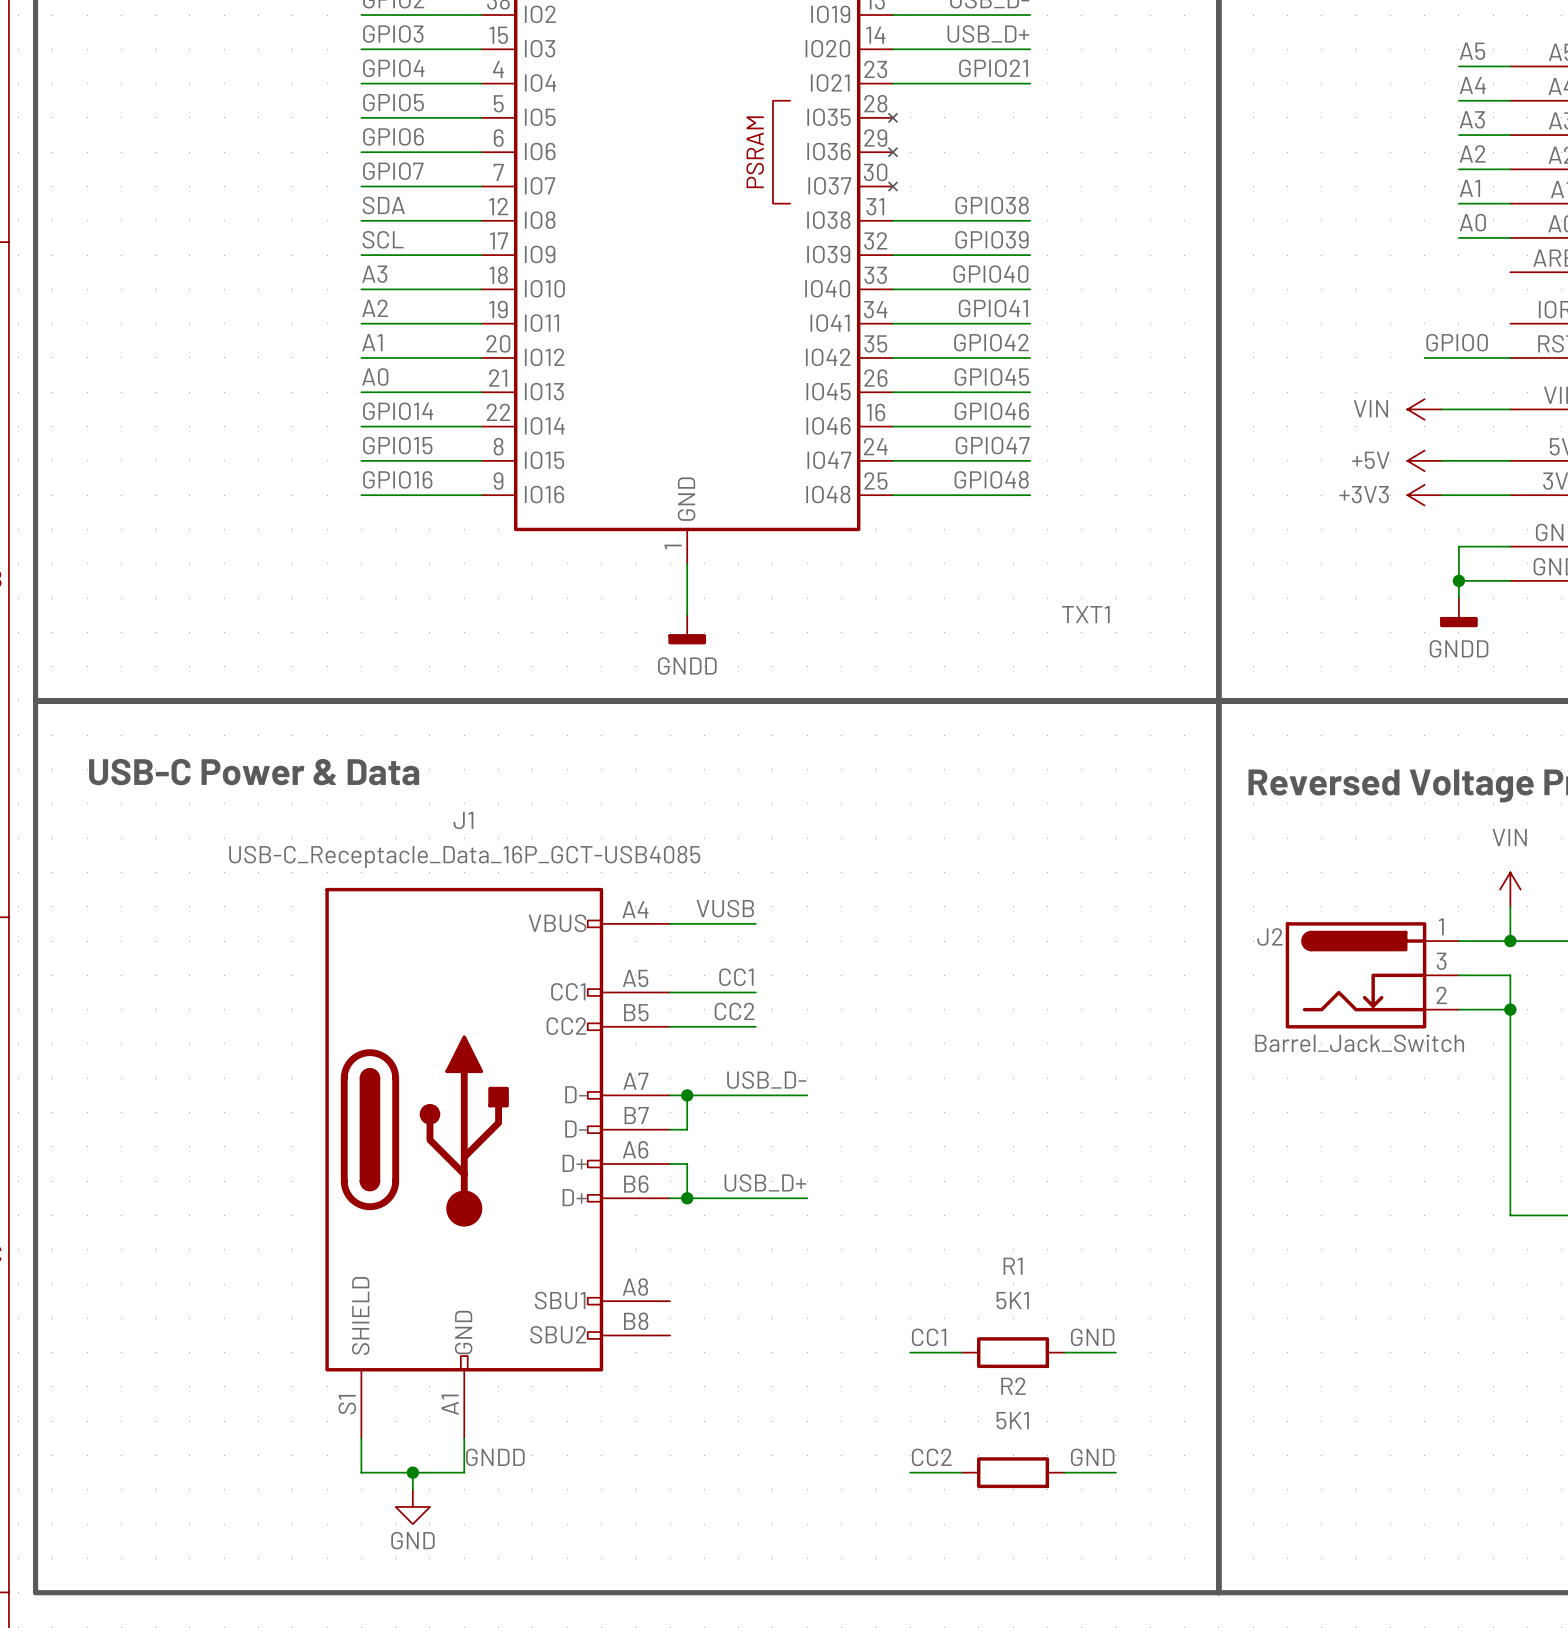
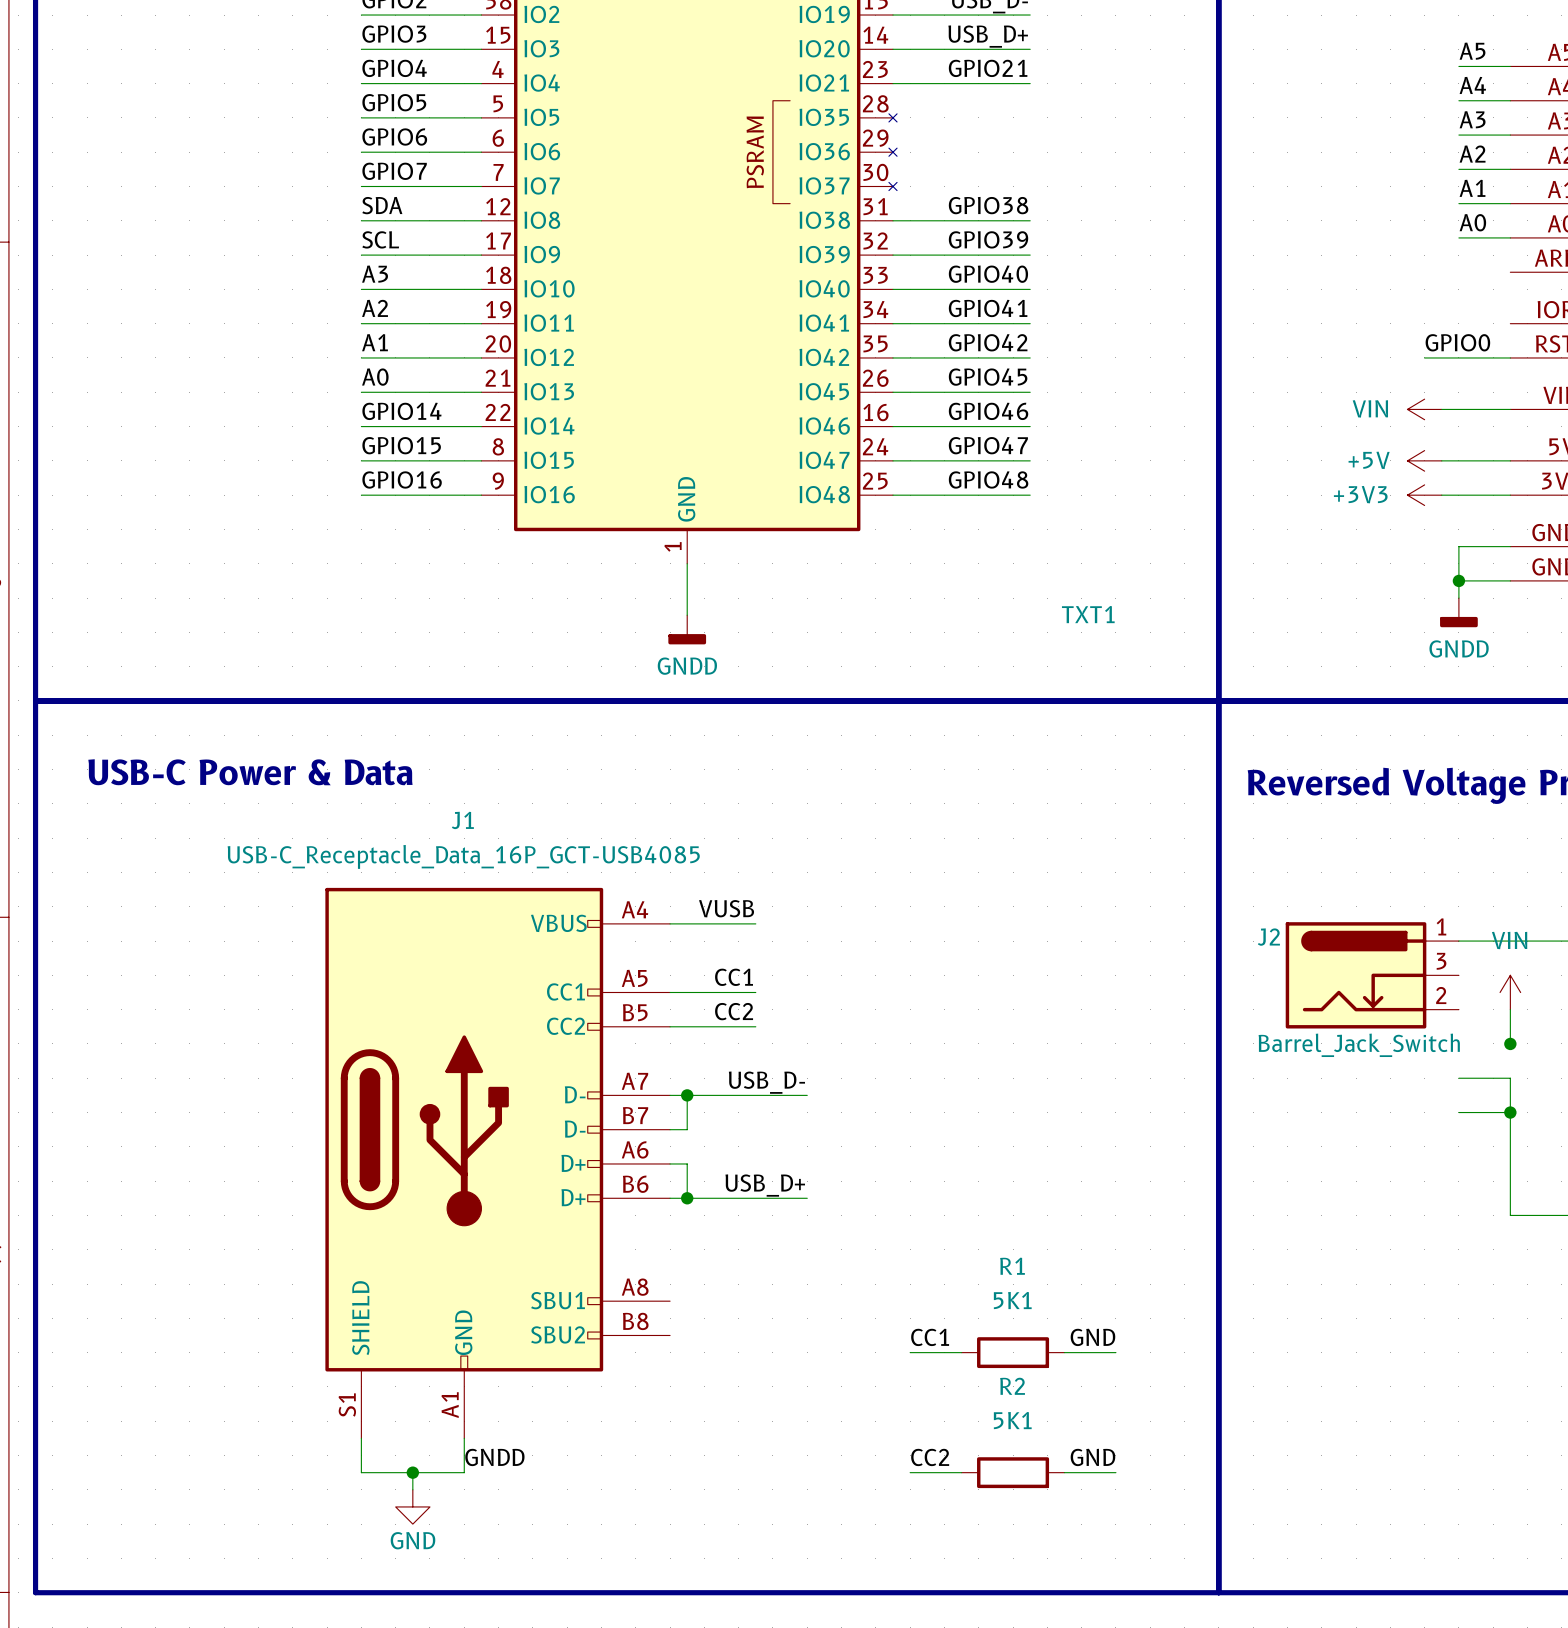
power symbol position: VIN (1510, 889) -> VIN (1510, 992)
wire: (1510, 906) (1510, 941) -> none
junction: (1510, 941) -> none
wire: (1458, 975) (1510, 975) (1510, 1009) (1458, 1009) -> none
junction position: (1510, 1009) -> (1510, 1043)
wire: (1510, 1043) (1510, 1078) -> (1458, 1078) (1510, 1078)
wire: none -> (1458, 1112) (1510, 1112)
junction: none -> (1510, 1112)

